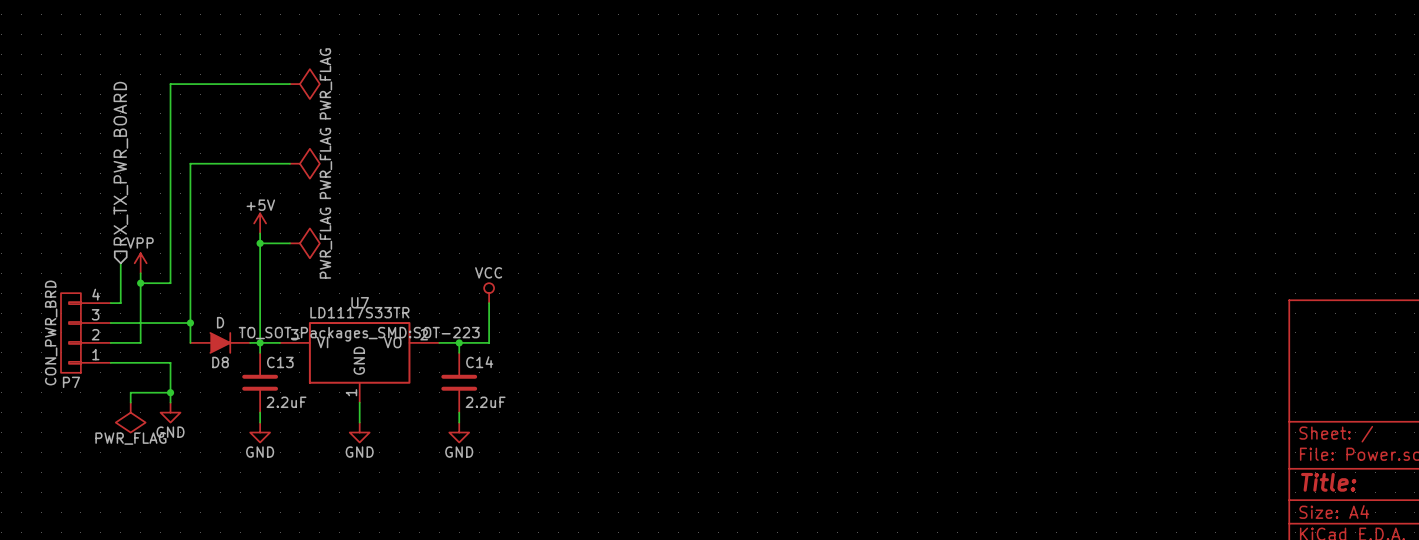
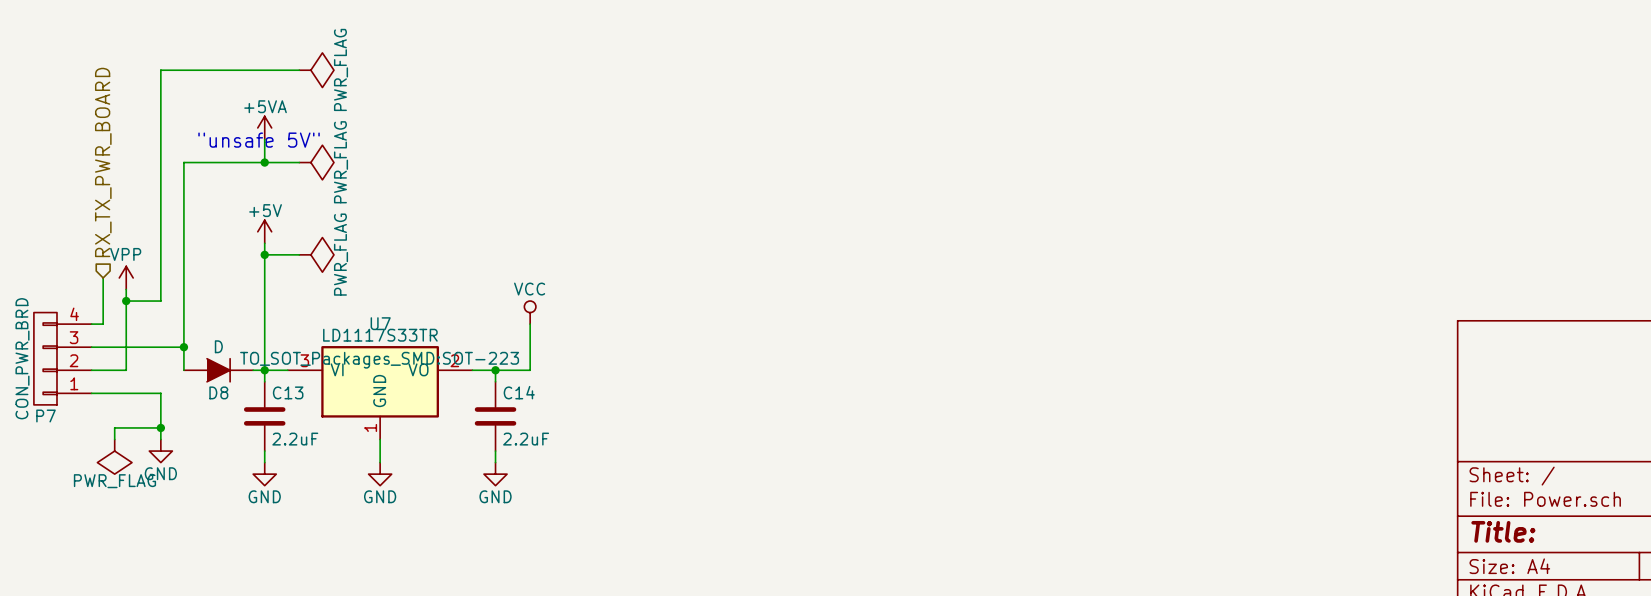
power symbol: none -> +5VA (264, 127)
wire: none -> (264, 139) (264, 162)
text: none -> "unsafe 5V" (259, 140)
junction: none -> (264, 162)

